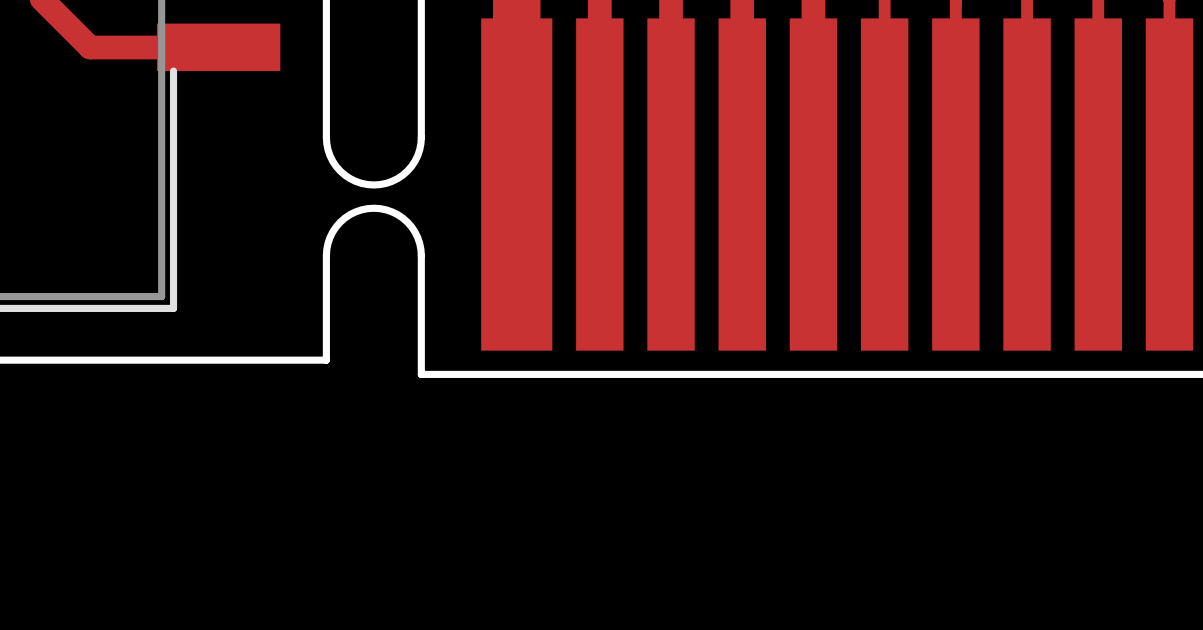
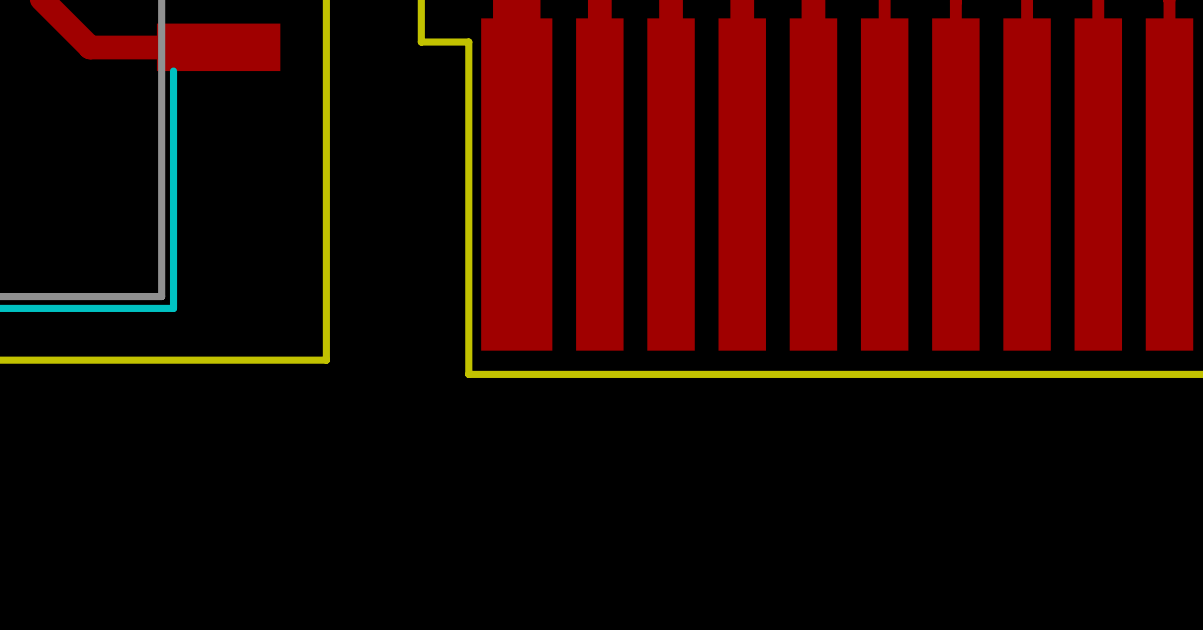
board edge: (421, 42) (420, 143) (417, 155) (407, 171) (397, 178) (380, 184) (367, 184) (355, 181) (344, 175) (336, 166) (330, 155) (326, 137) -> (326, 255) (326, 137)
board edge: (326, 255) (328, 243) (332, 231) (340, 222) (350, 214) (367, 208) (380, 208) (392, 211) (402, 218) (414, 231) (420, 249) (421, 374) (468, 374) -> (421, 42) (468, 42) (468, 374)

